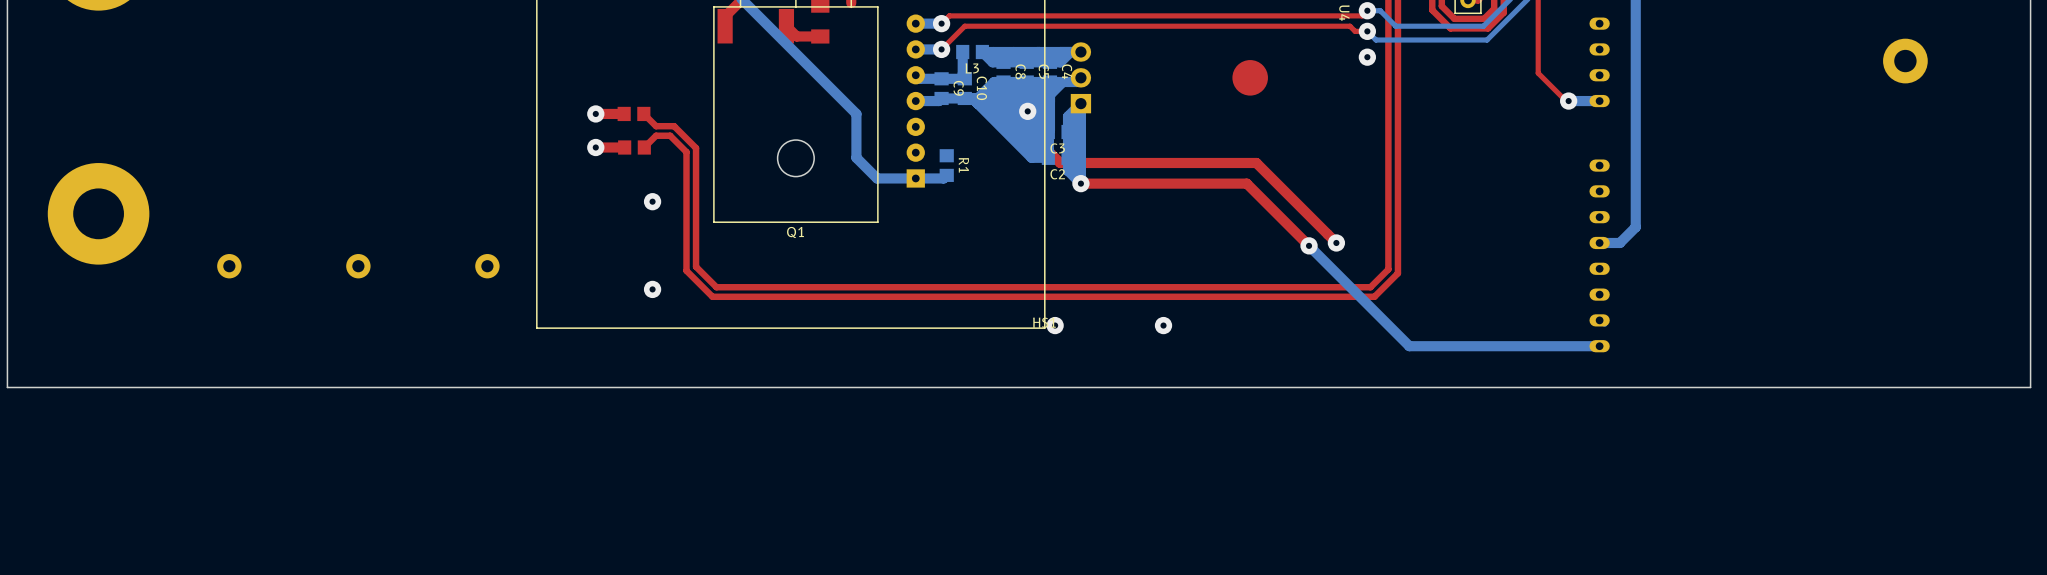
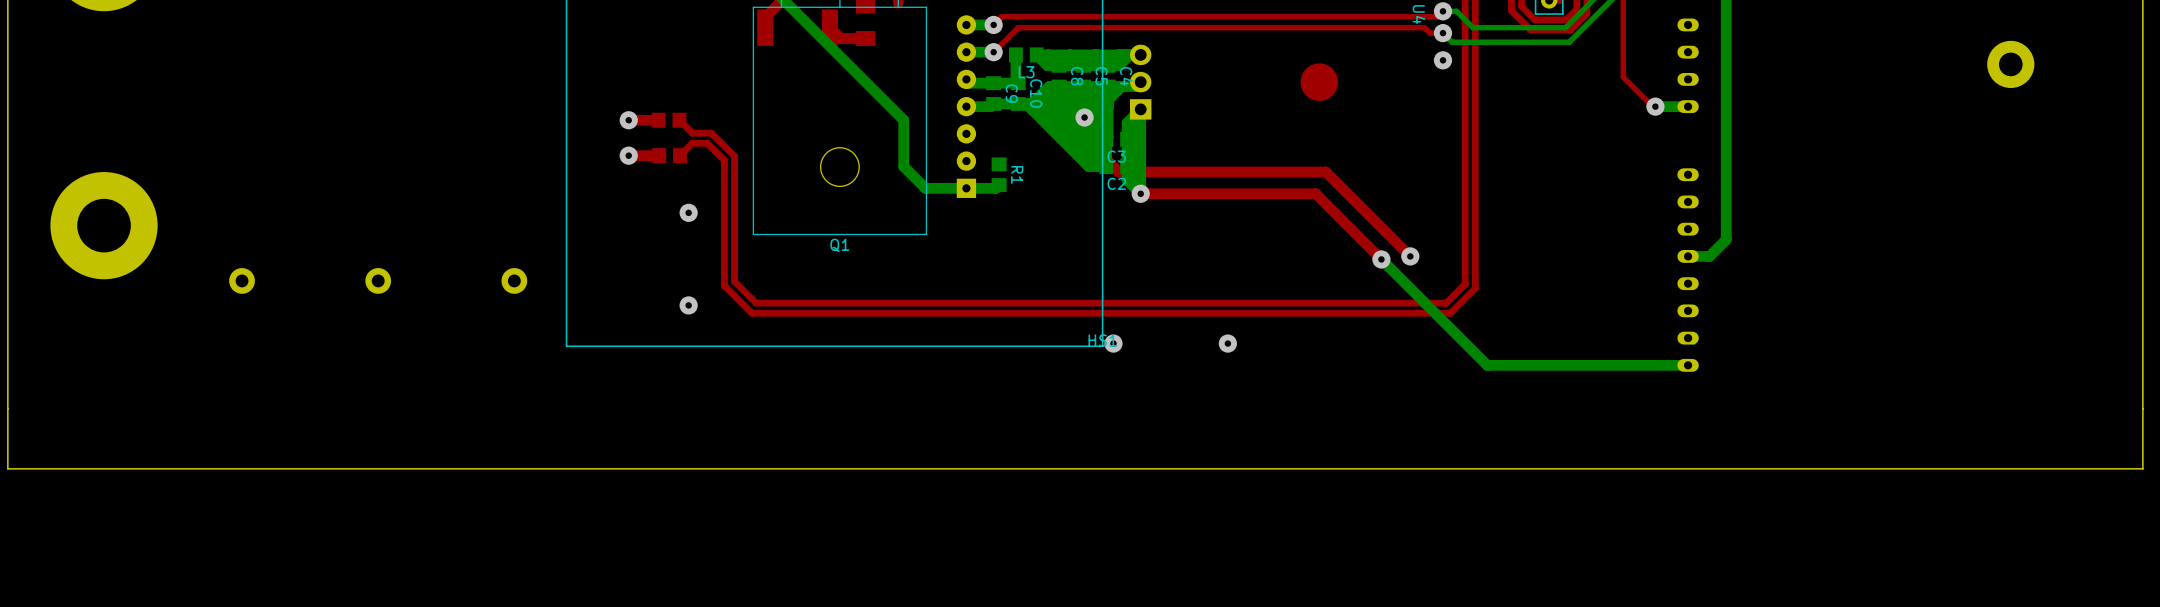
board edge: (2030, 387) (7, 387) -> (2142, 408) (2142, 468) (7, 468) (7, 408)

